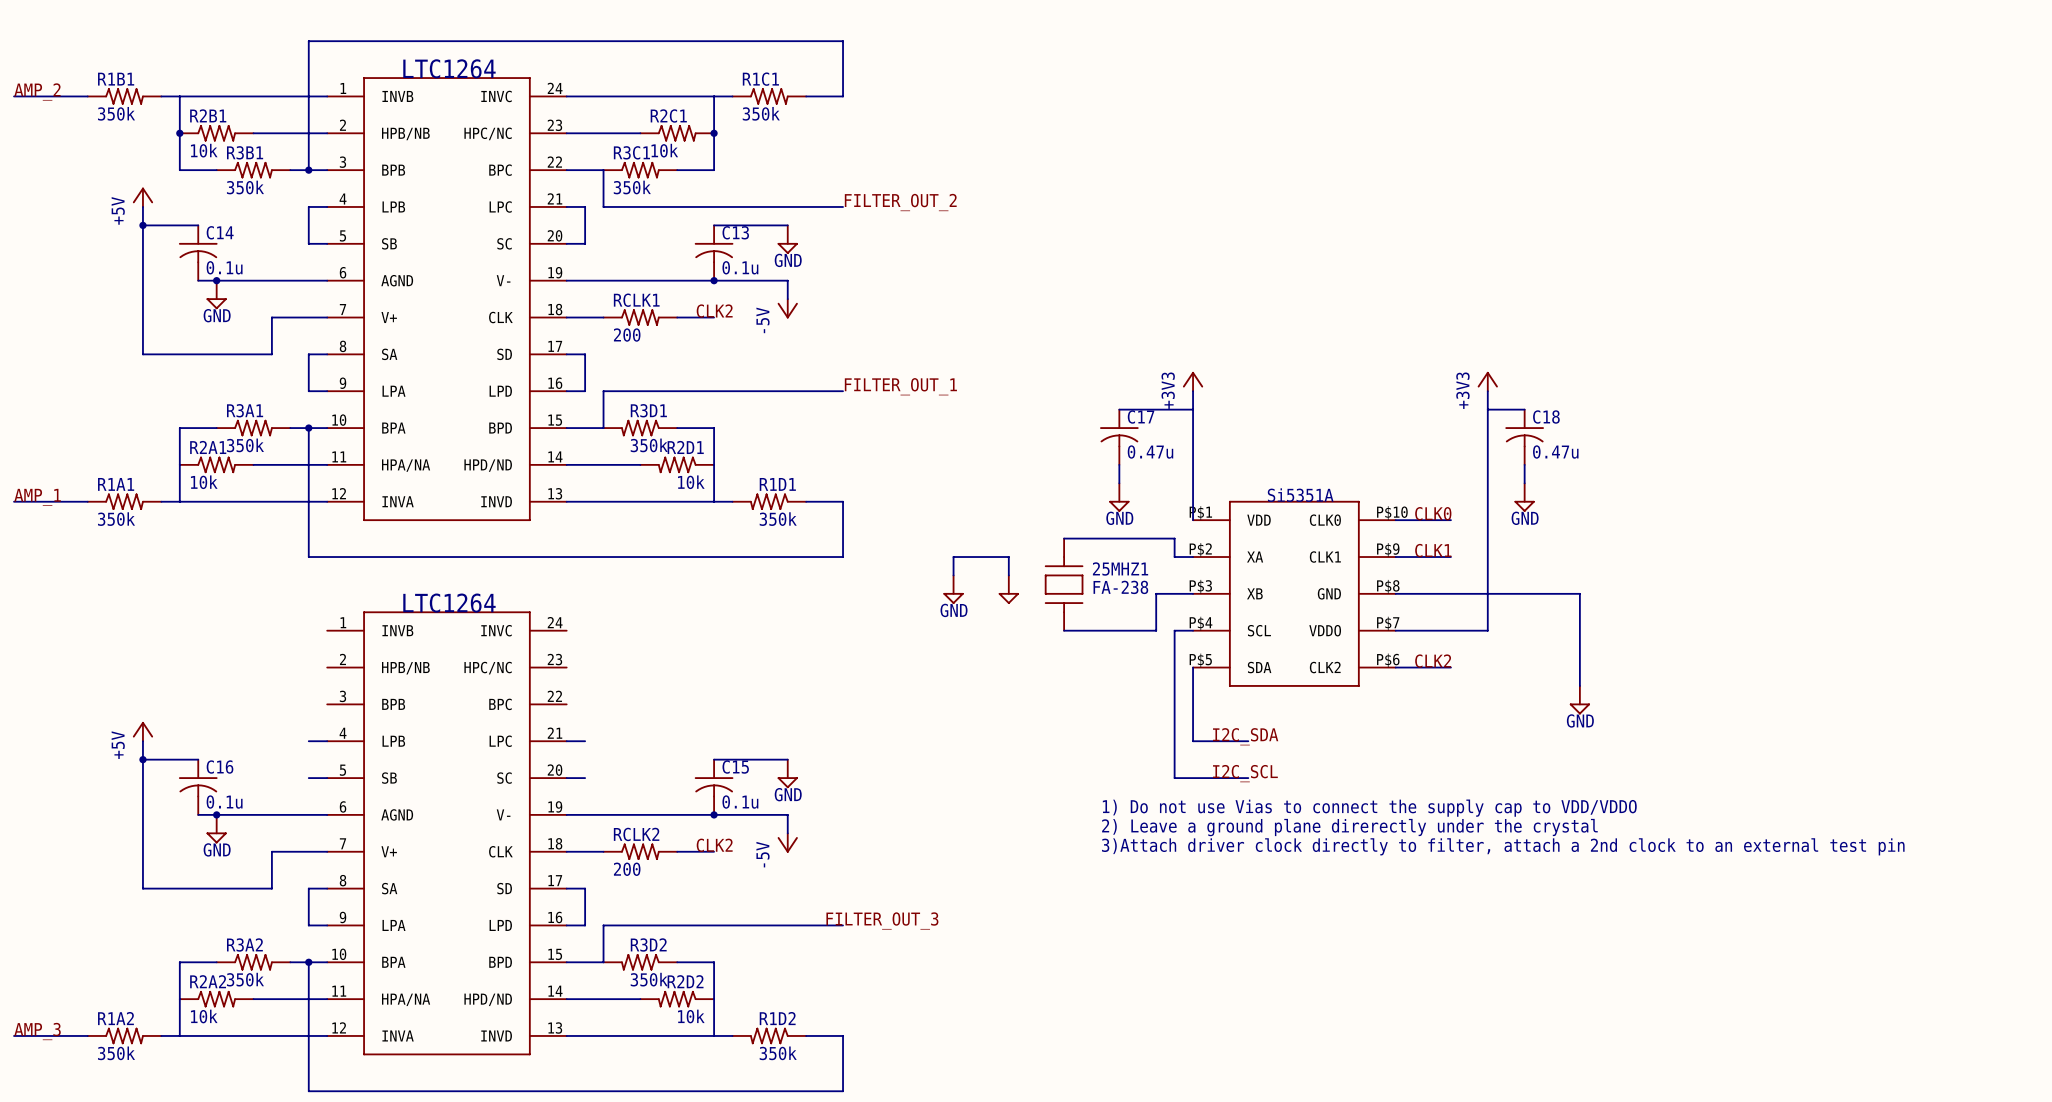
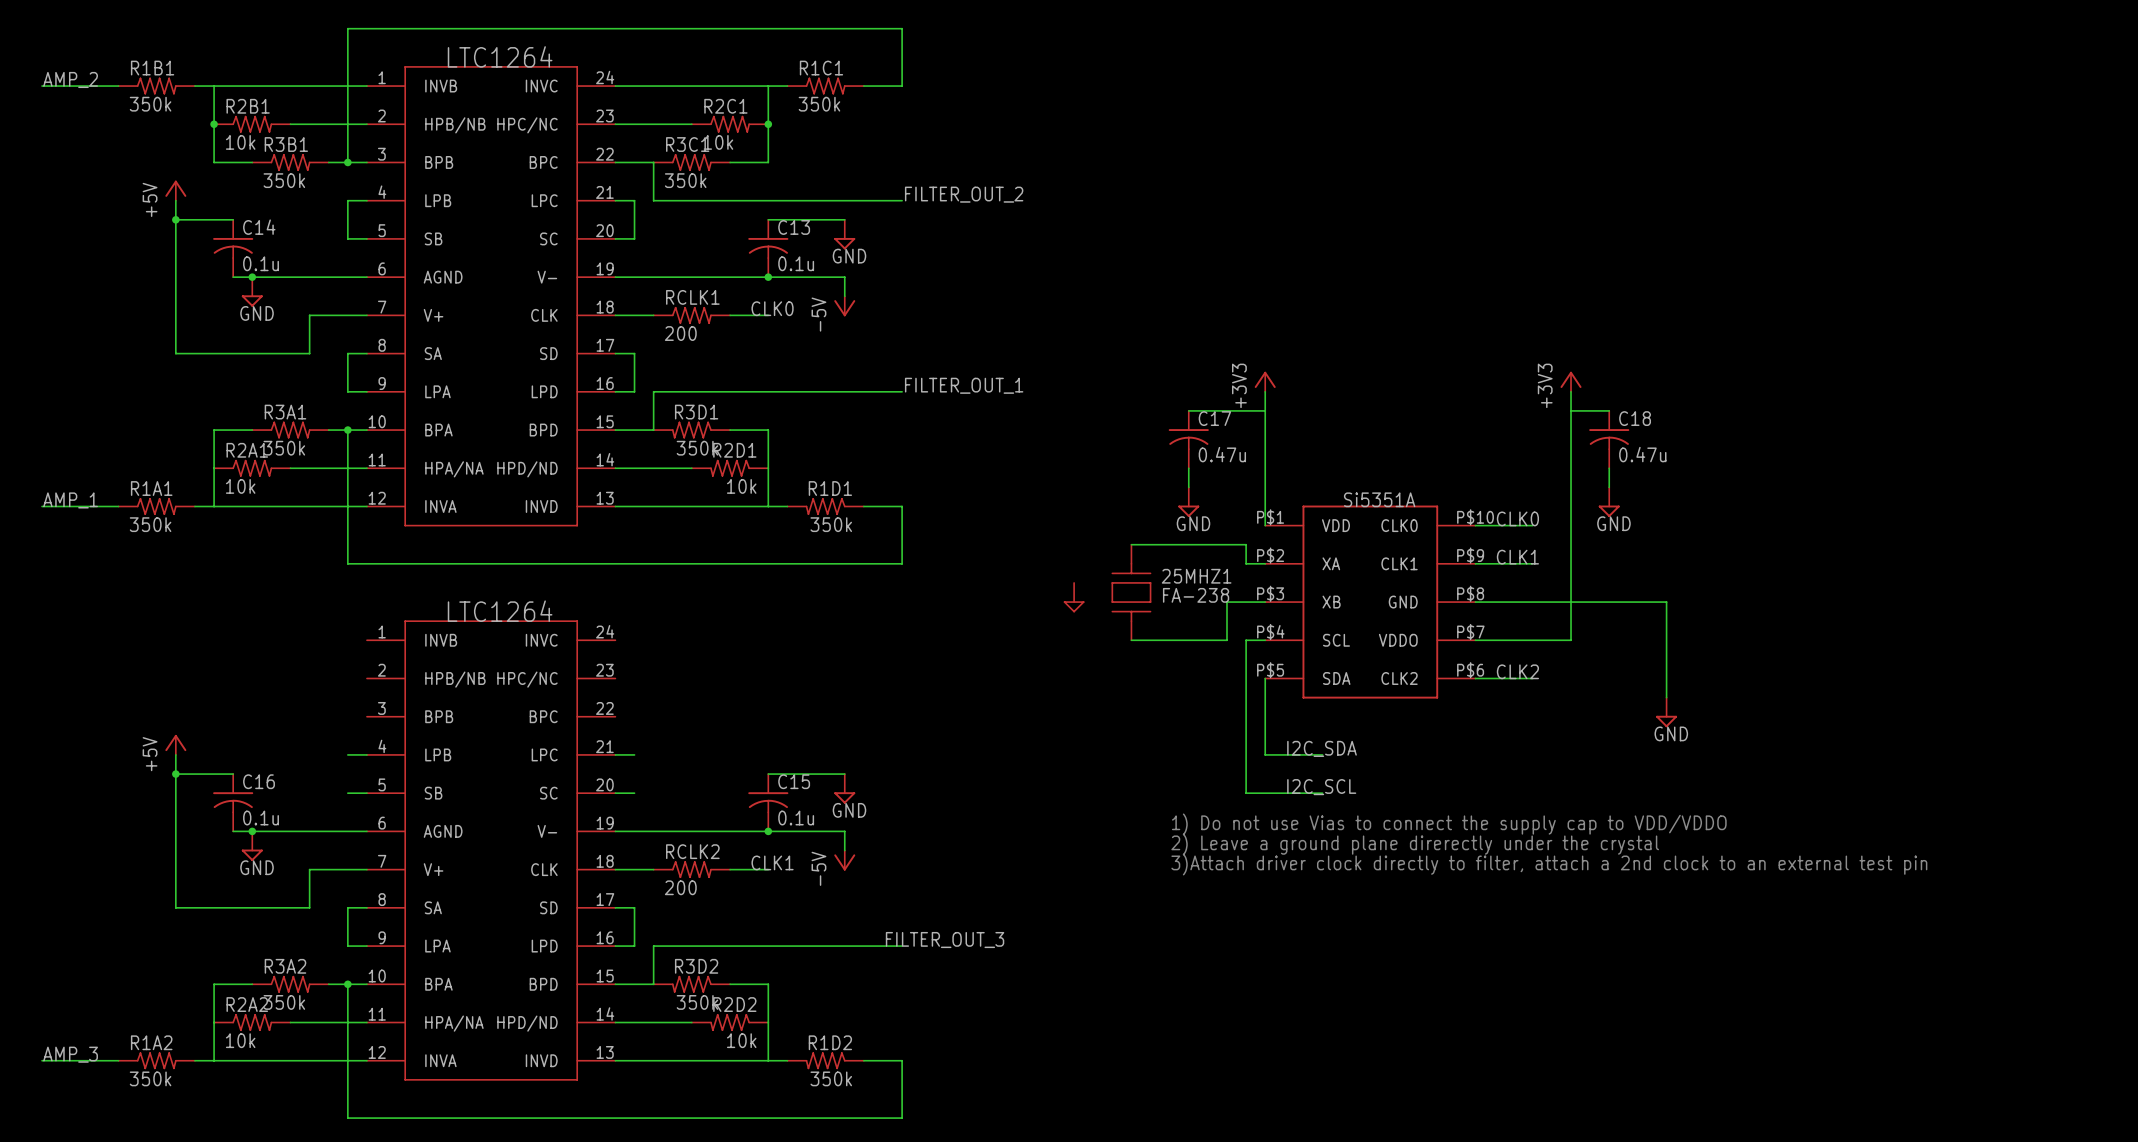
label: CLK2 (714, 311) -> CLK0 (772, 308)
wire: (953, 575) (953, 557) (1008, 557) (1008, 575) -> none
power symbol: GND (953, 589) -> none
label: CLK2 (714, 845) -> CLK1 (772, 862)

